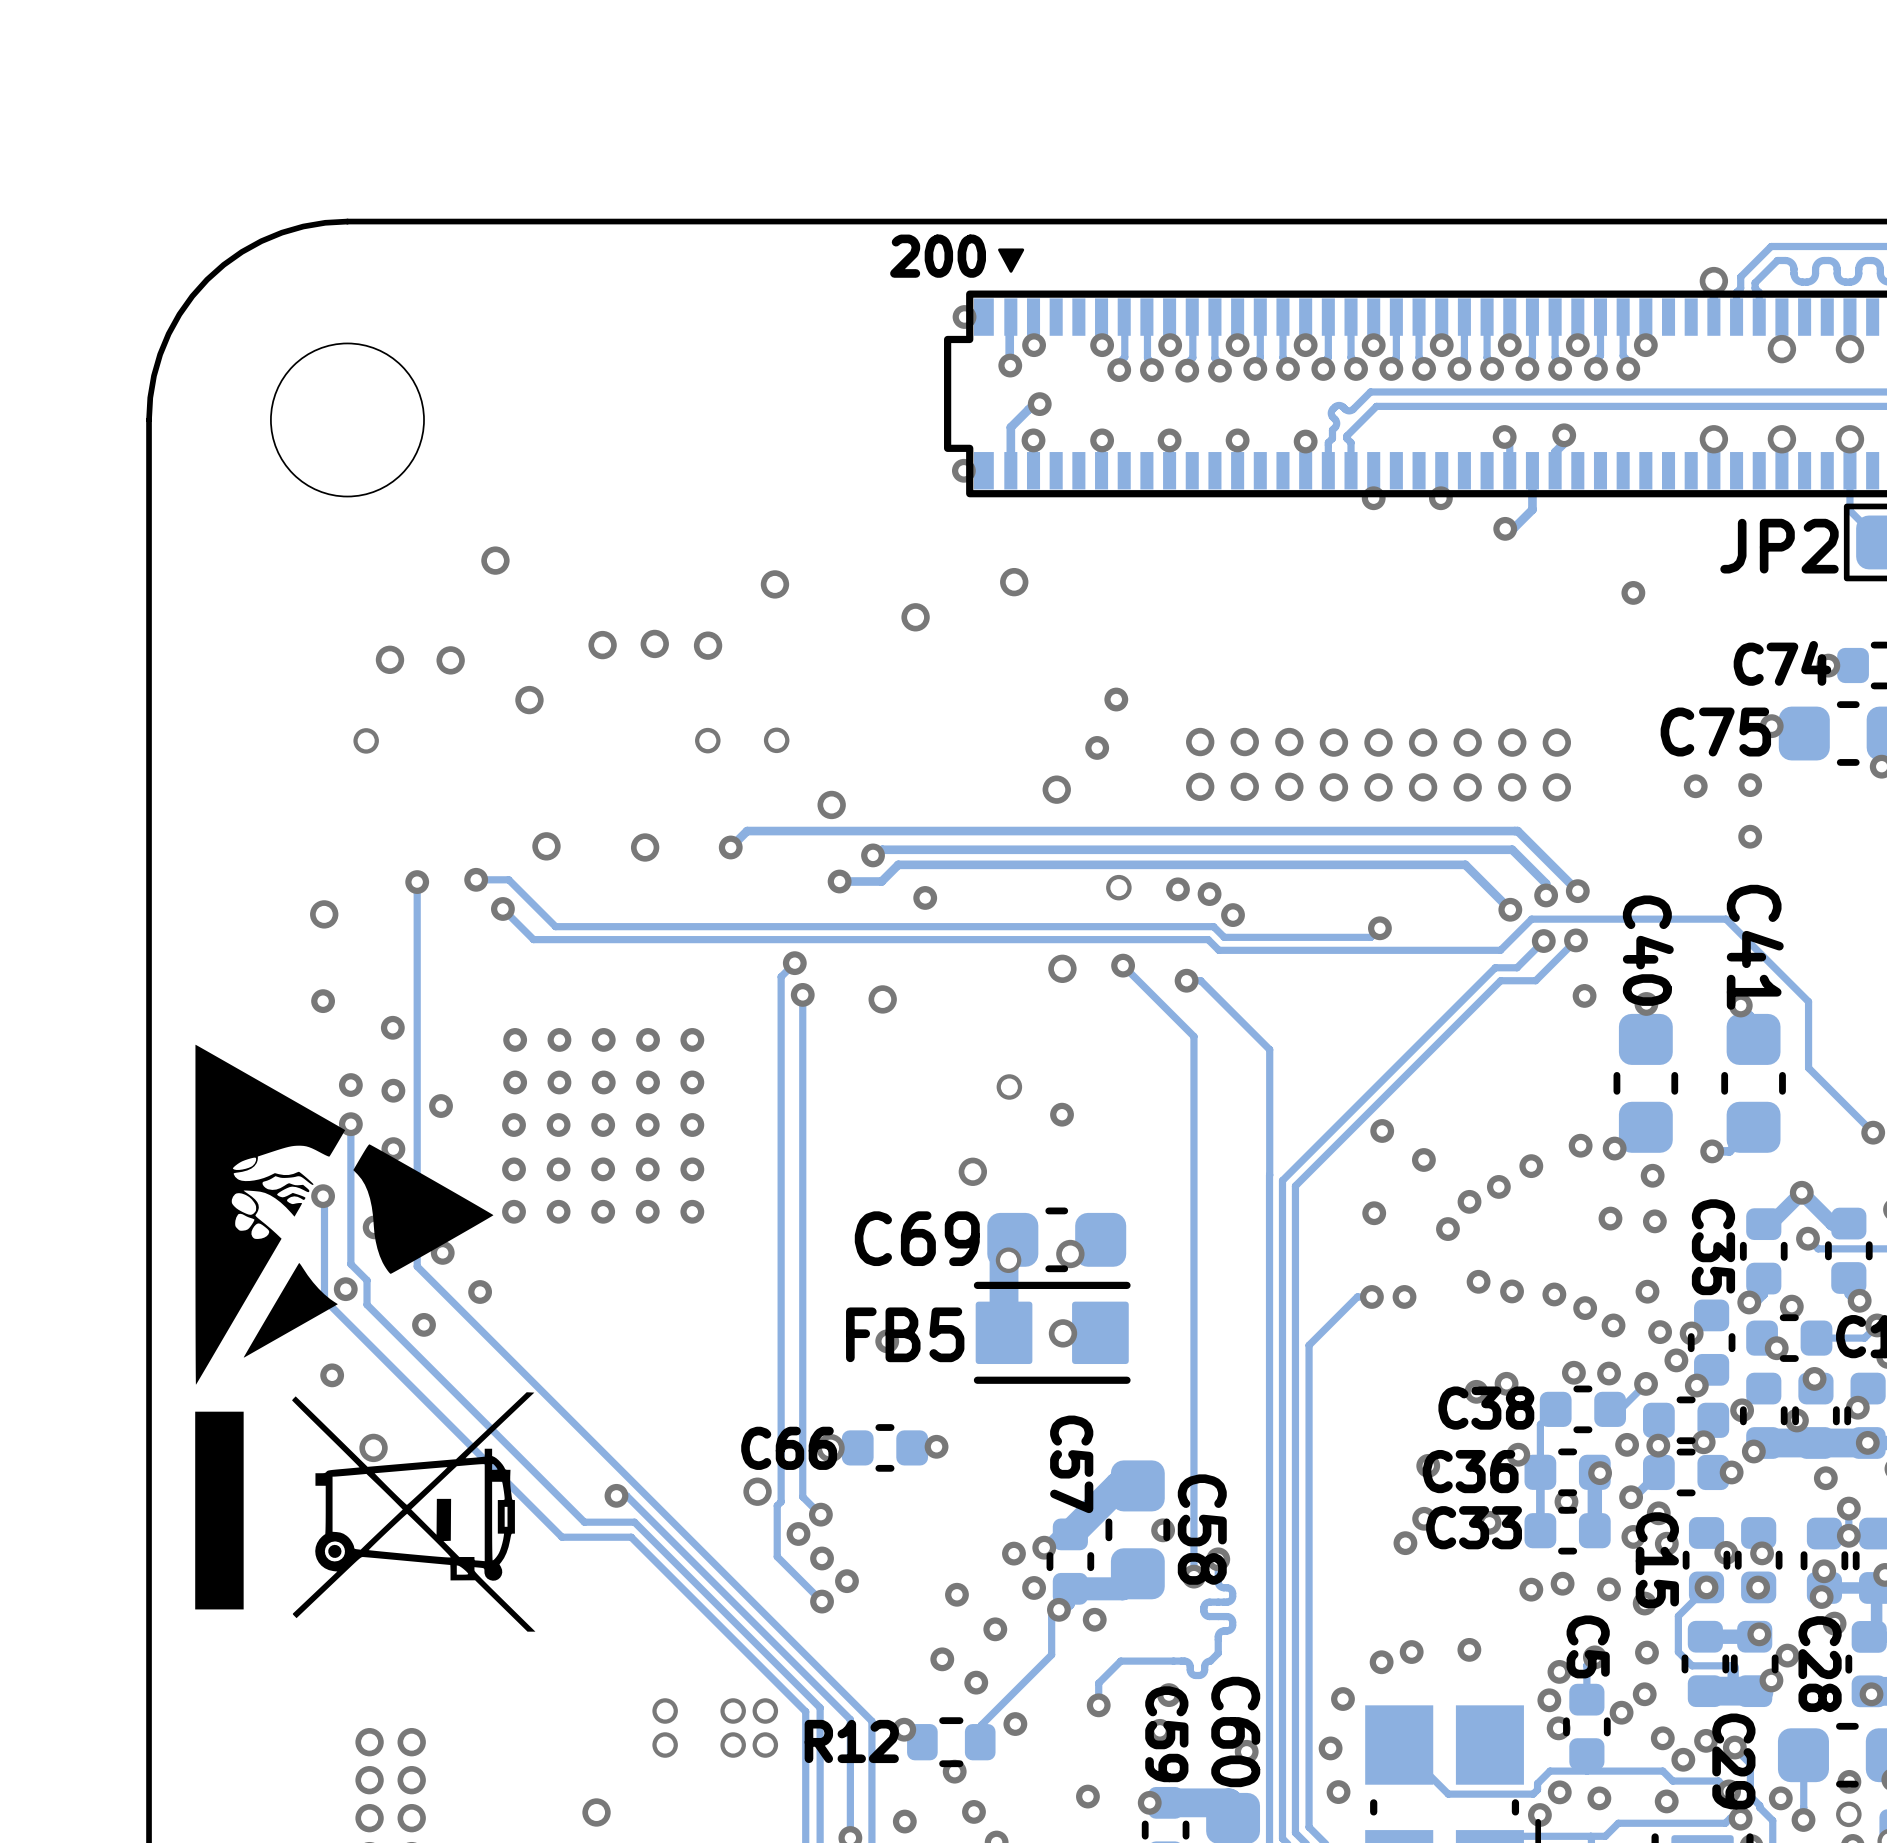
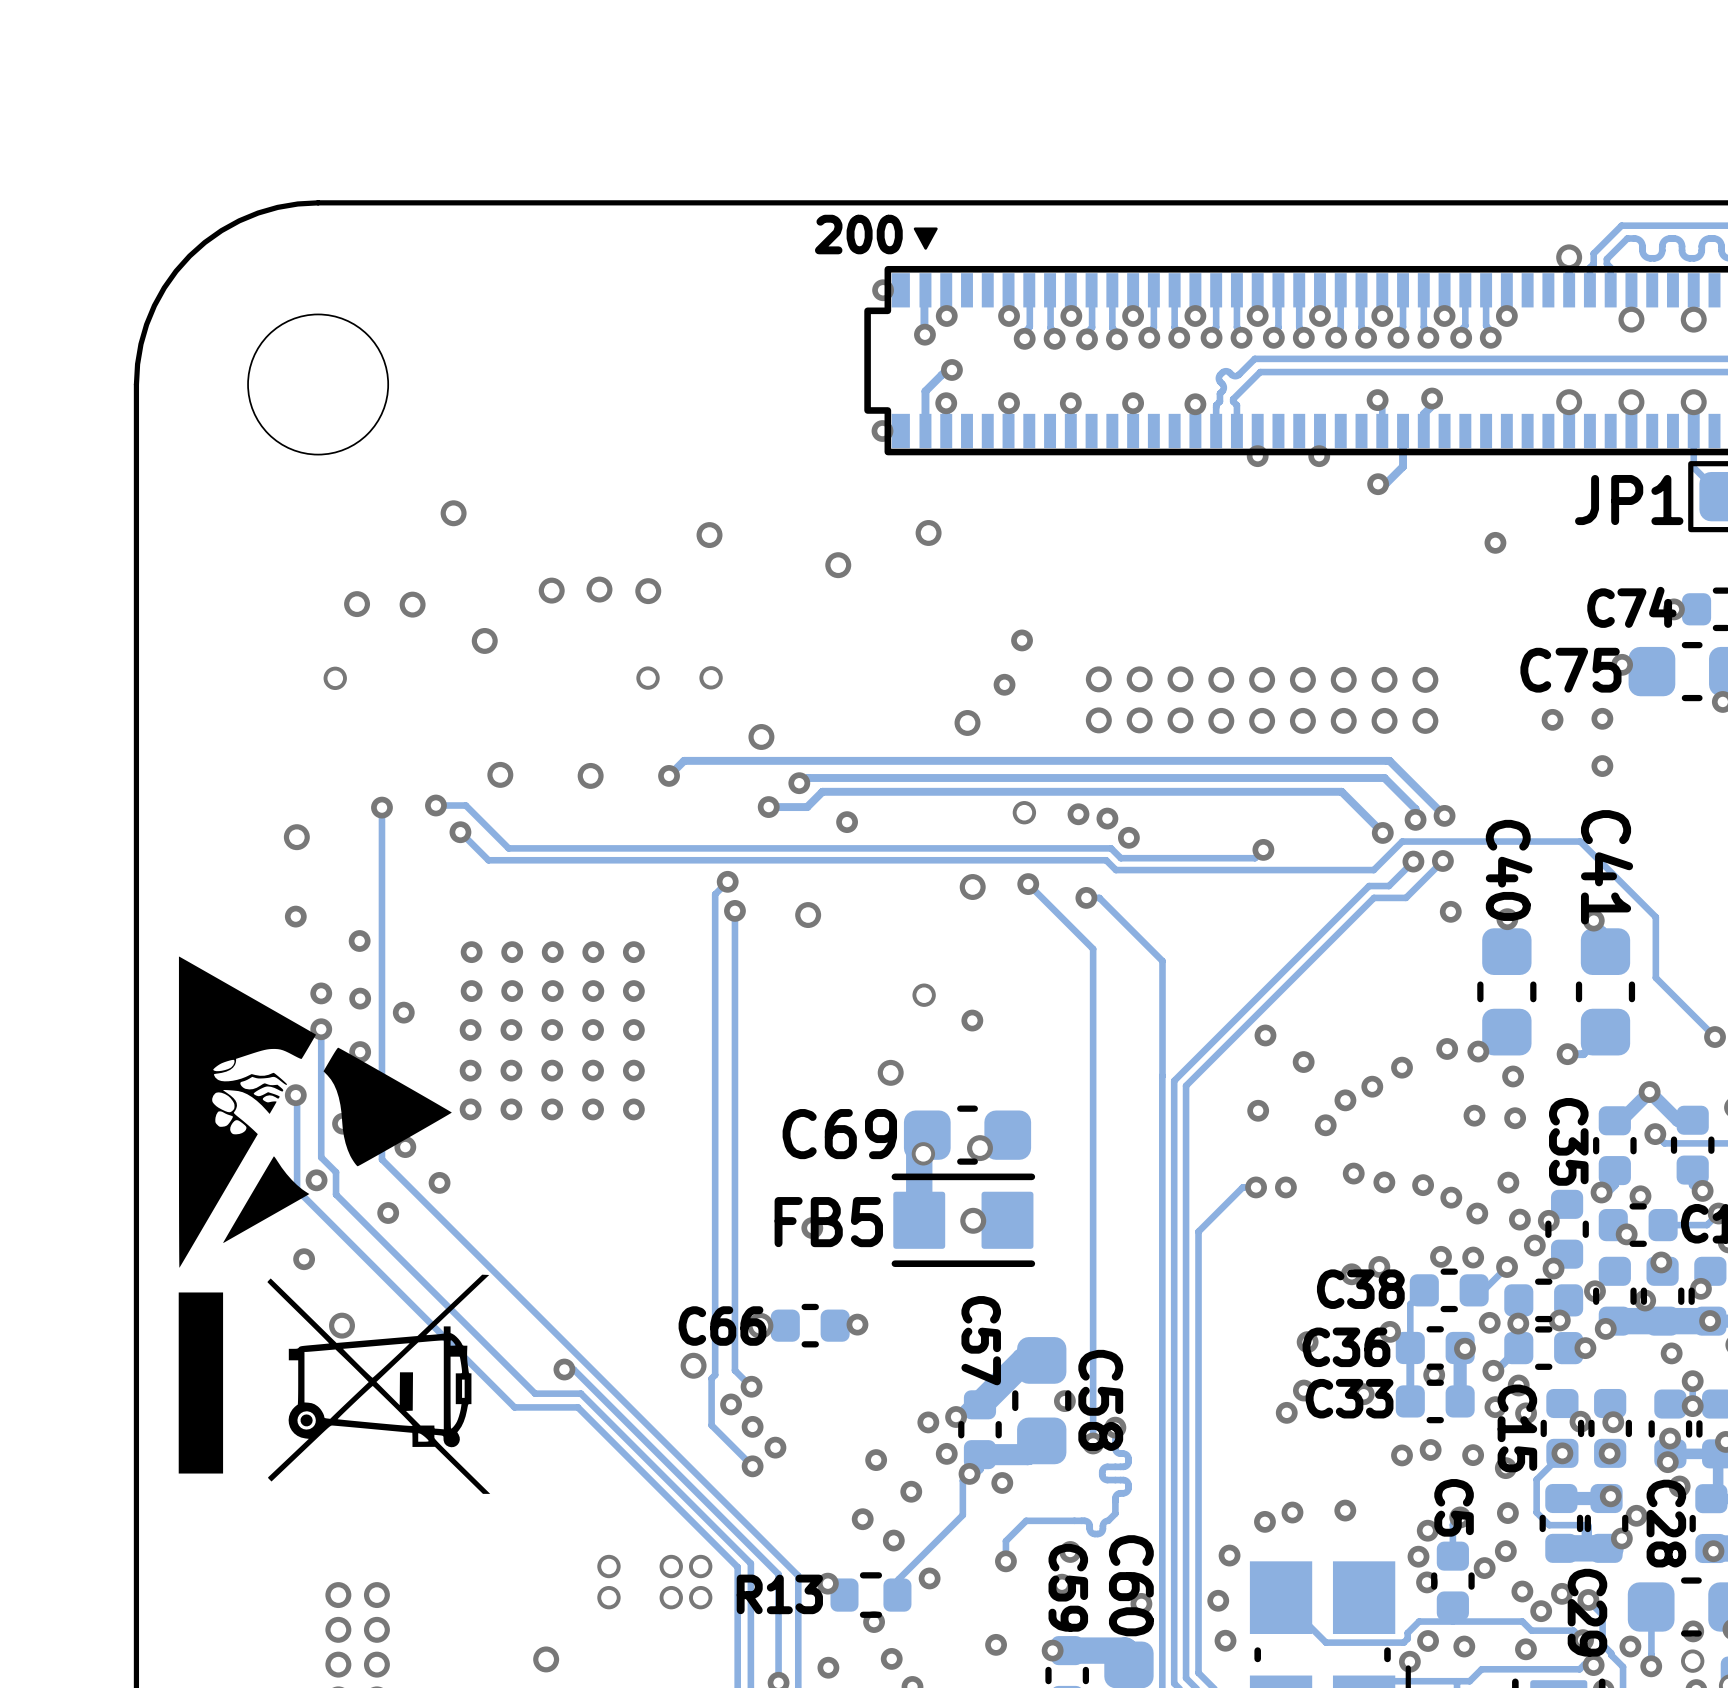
JP2 name: JP2 (1779, 546) -> JP1 (1629, 500)
R12 name: R12 (851, 1741) -> R13 (779, 1594)

